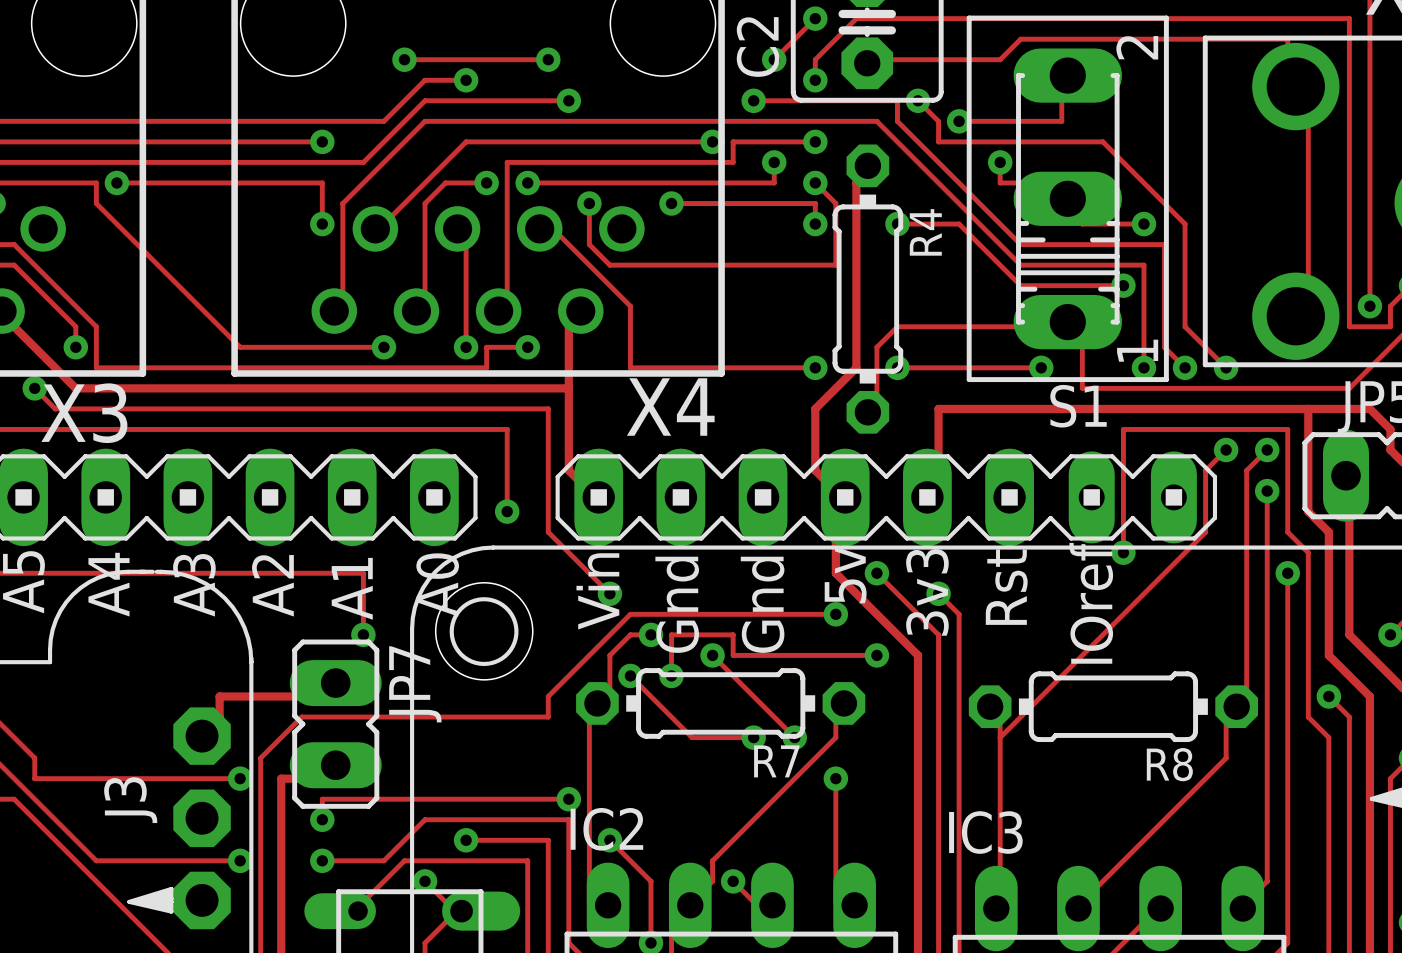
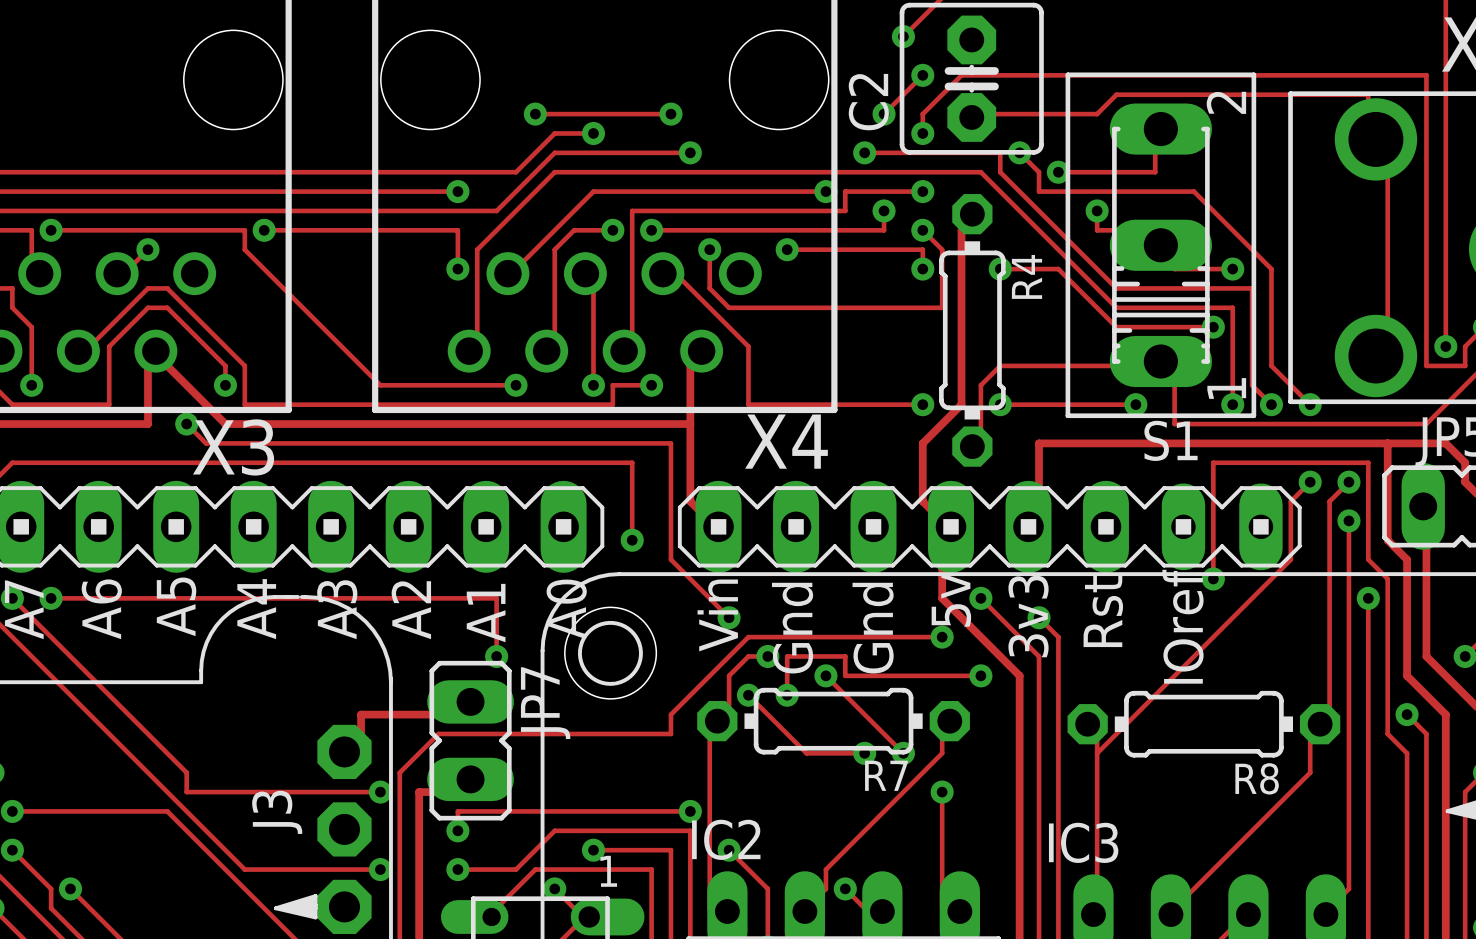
text: none -> 1 (608, 871)

